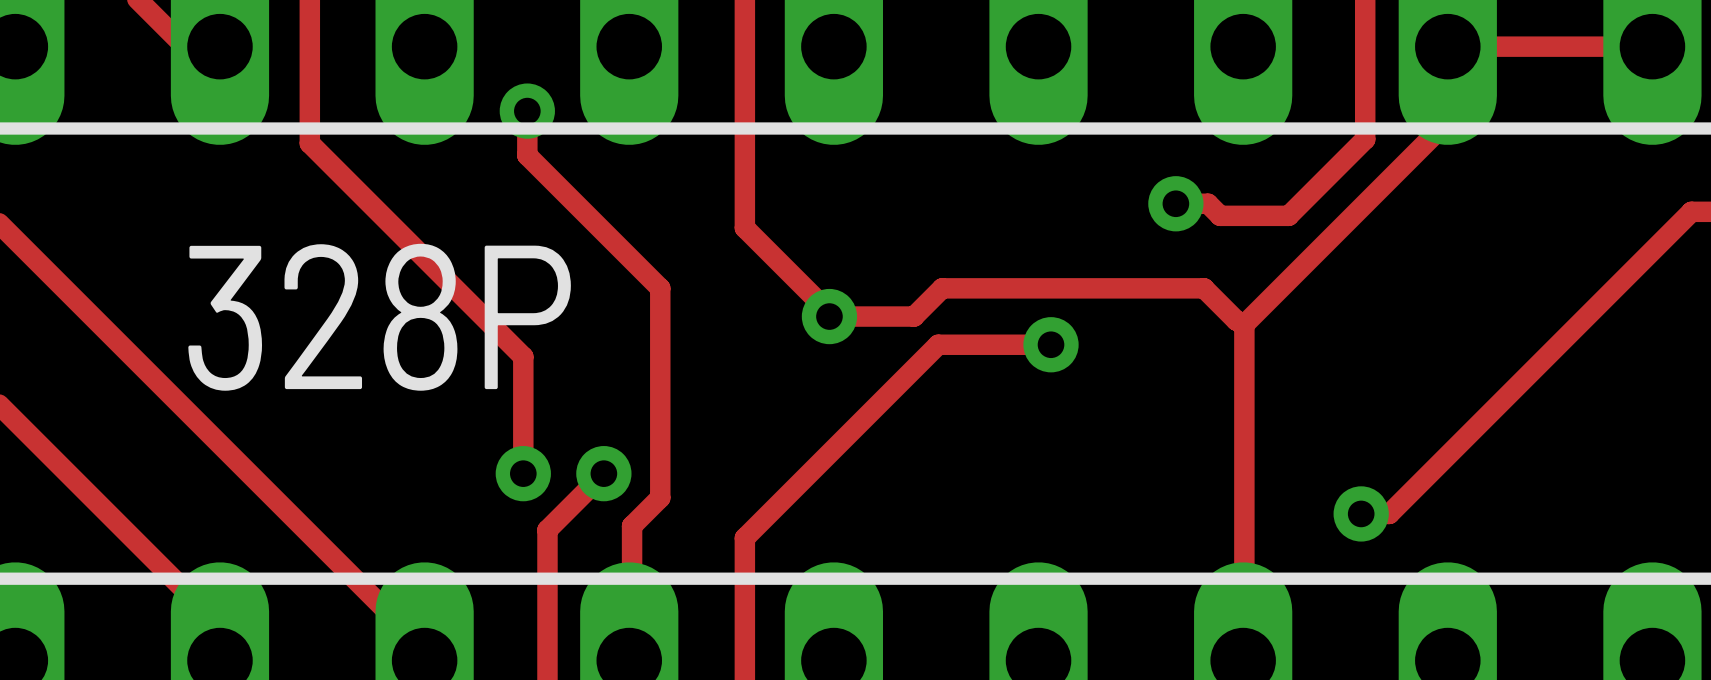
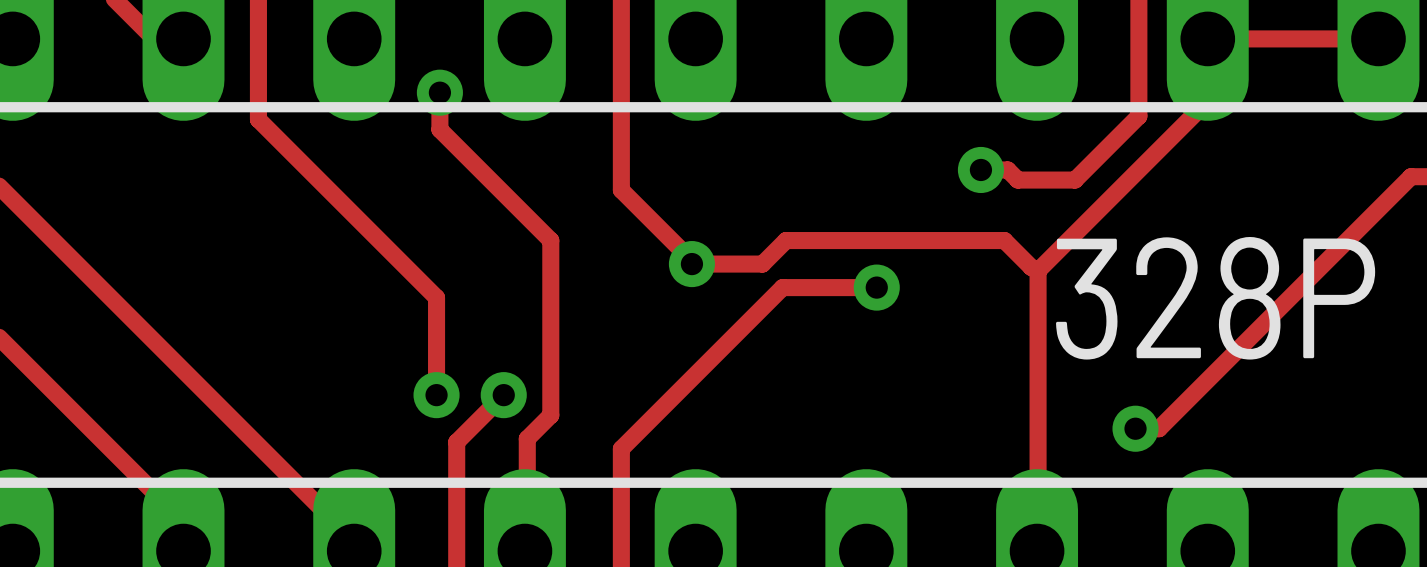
328P name position: 328P (379, 317) -> 328P (1215, 298)

